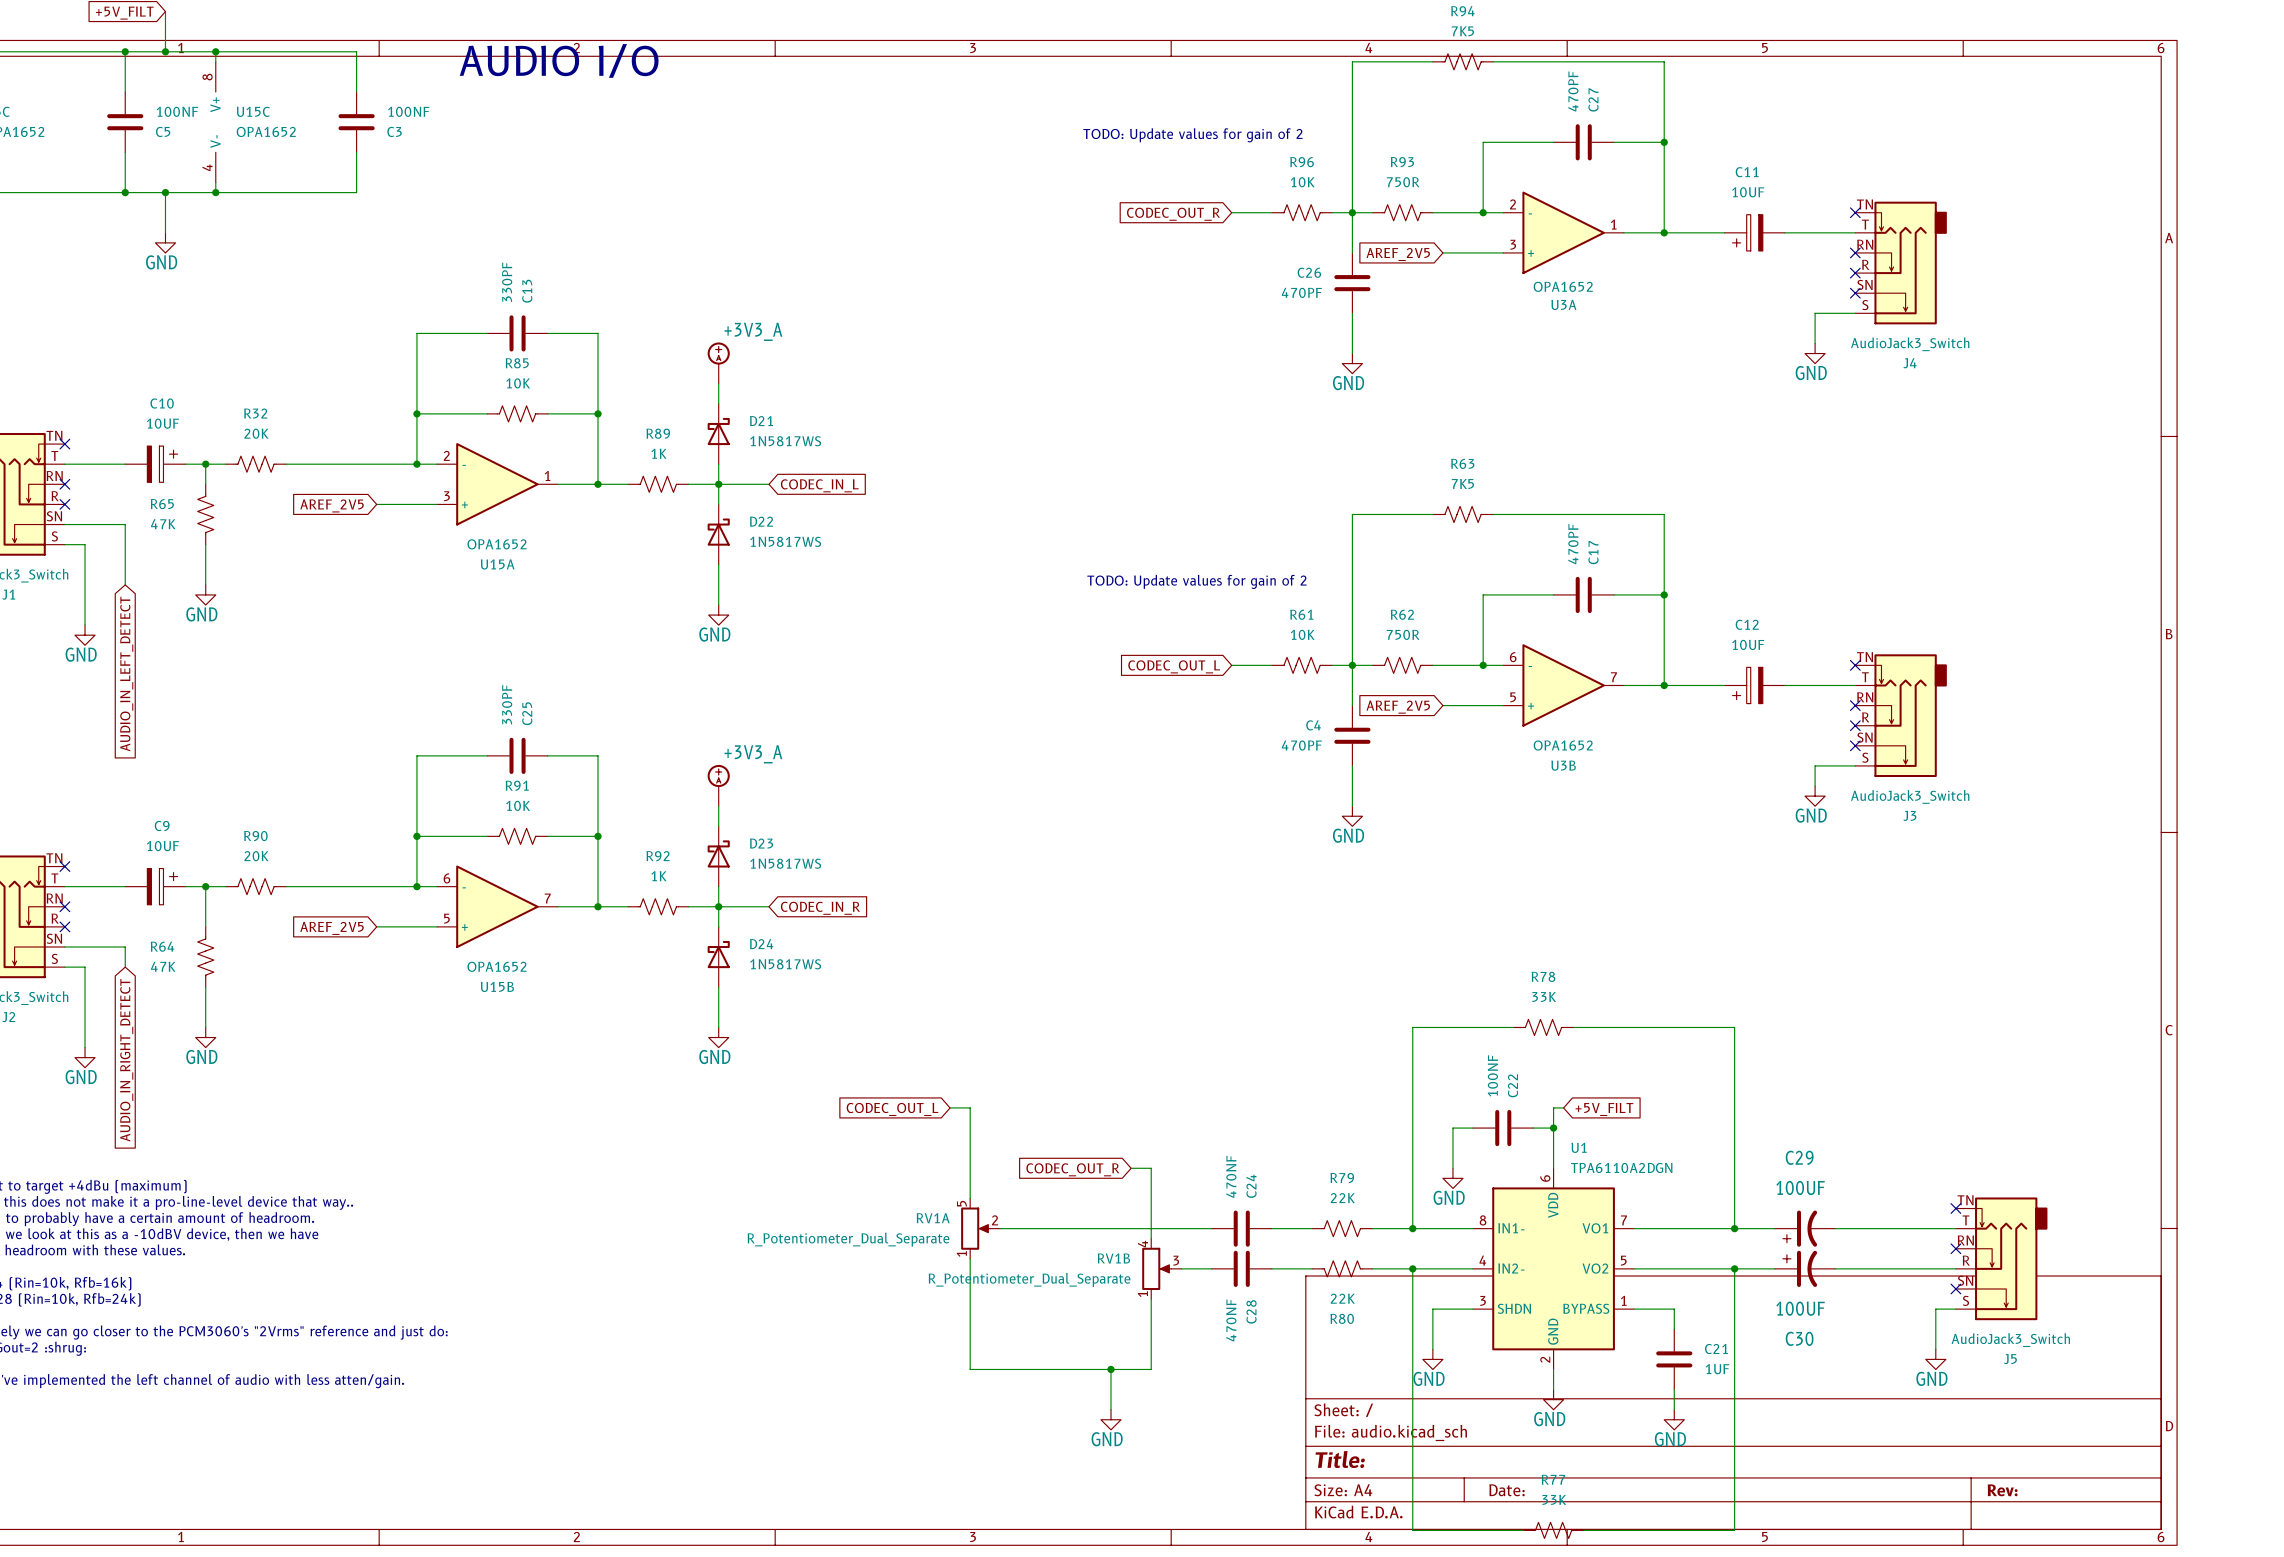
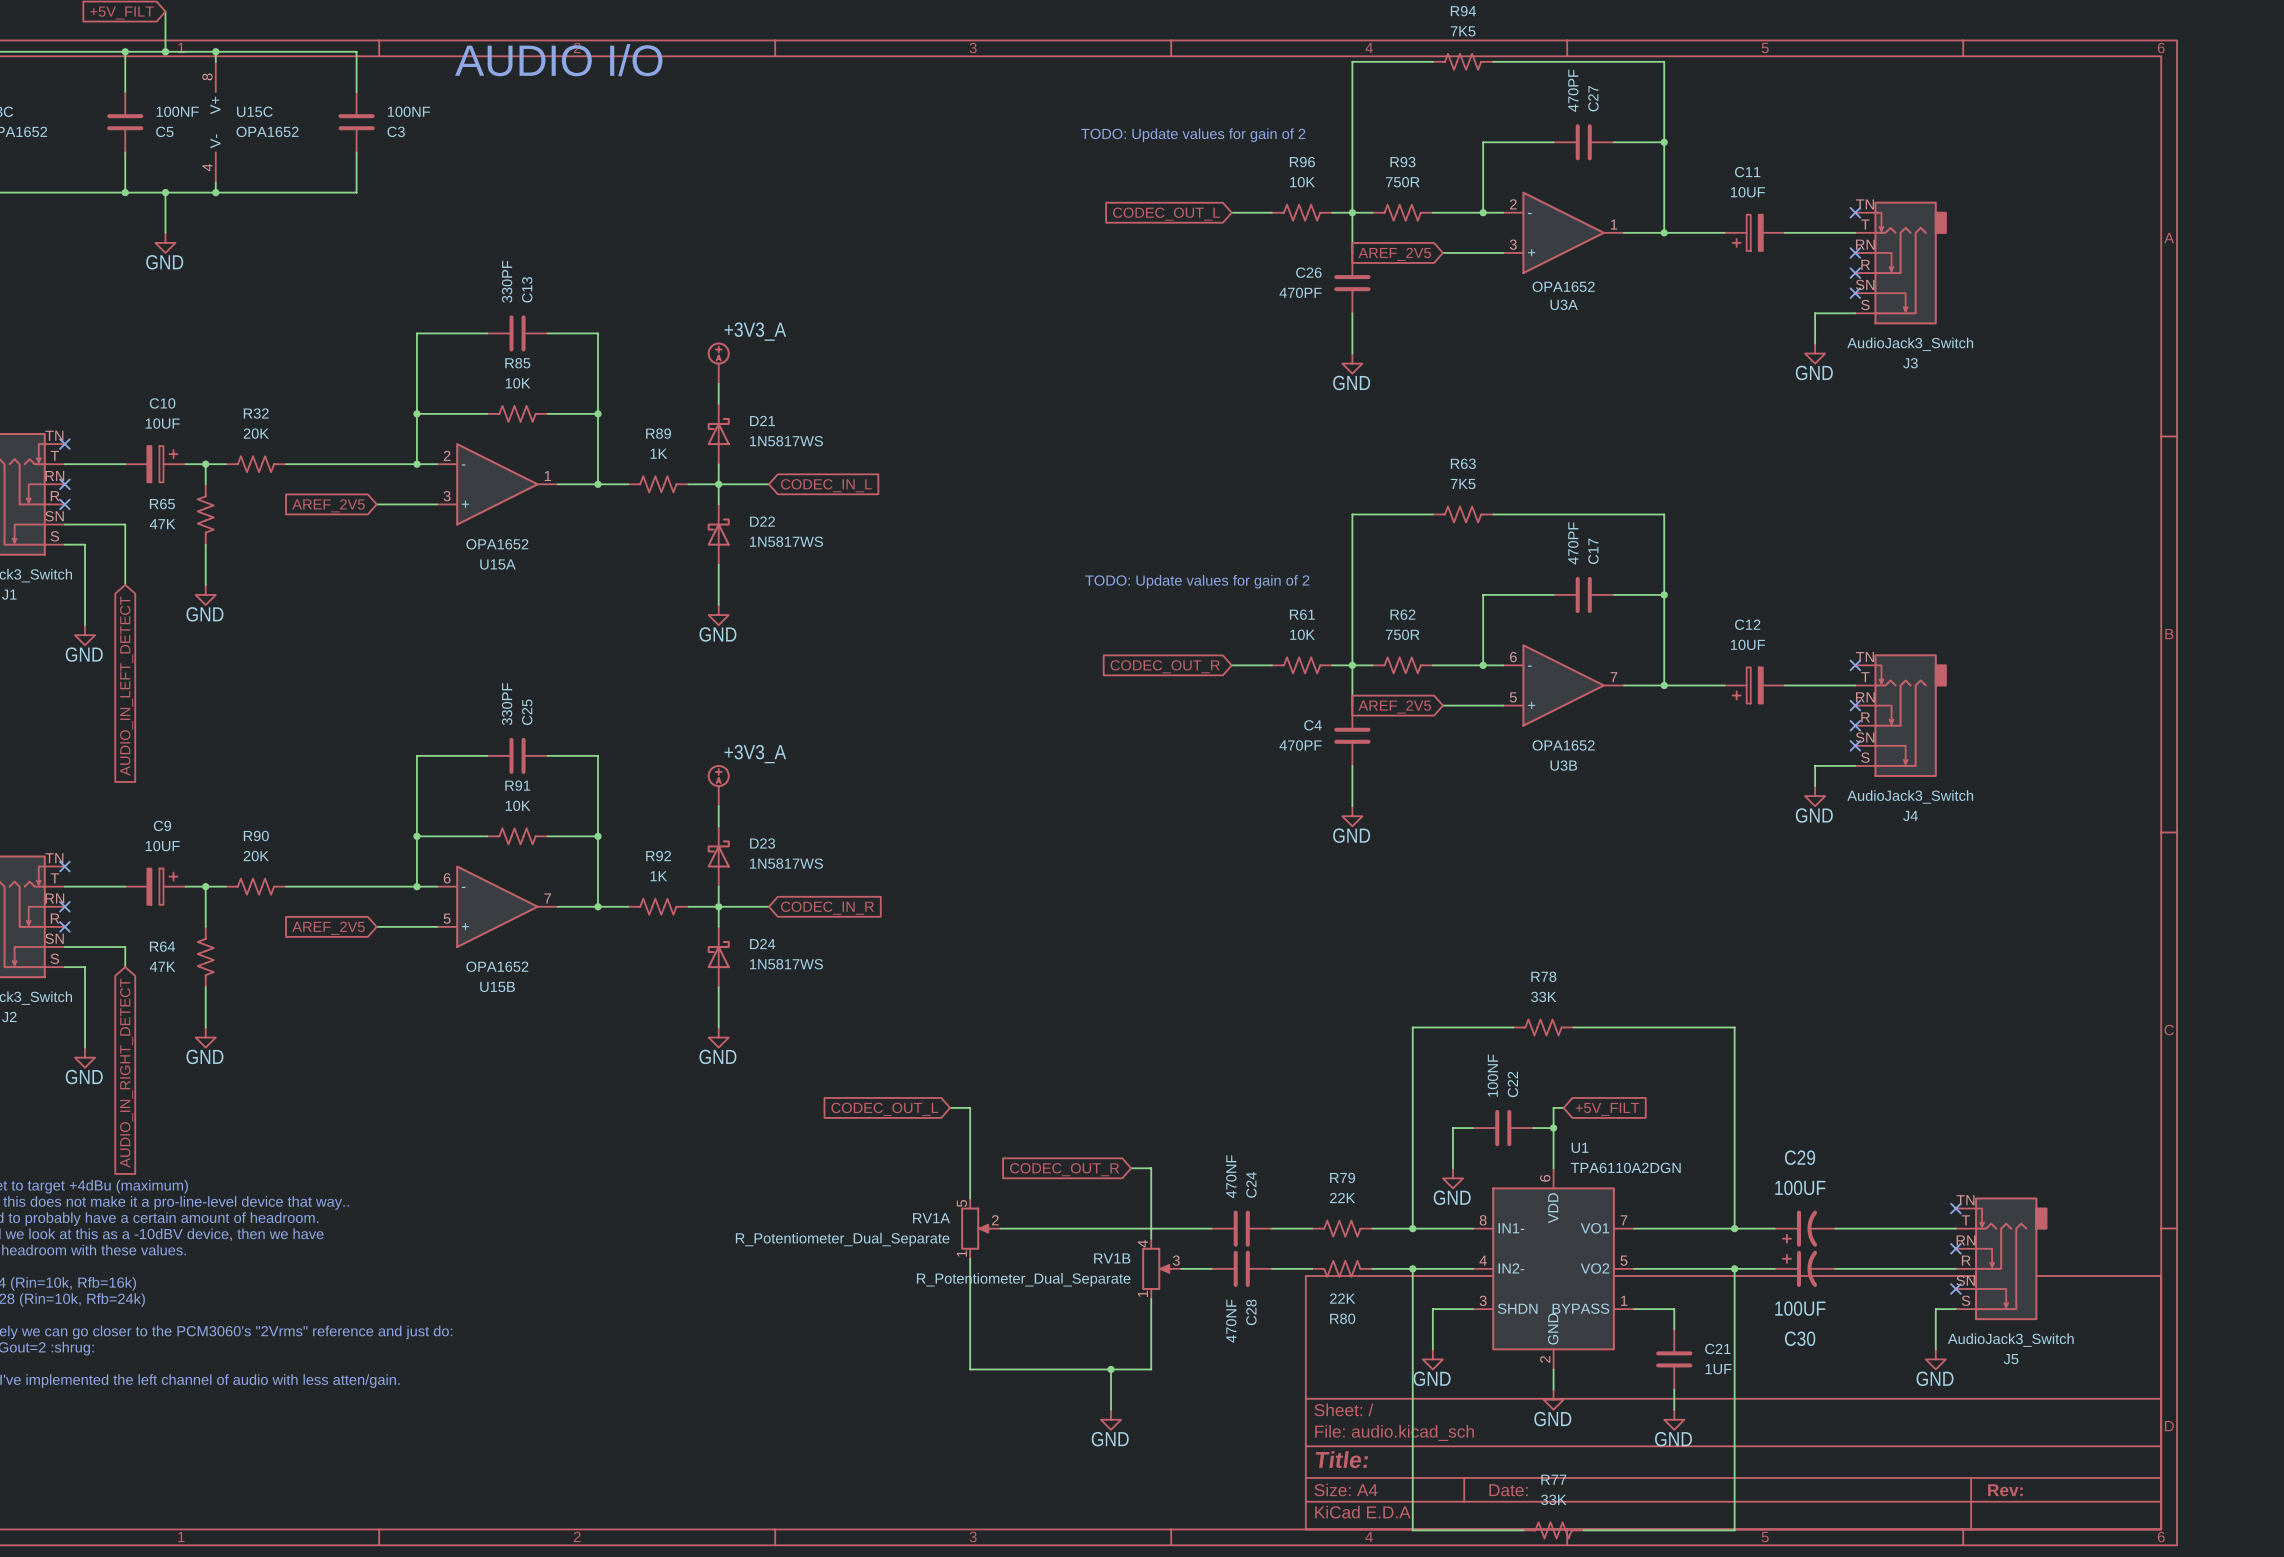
global label: CODEC_OUT_R (1173, 214) -> CODEC_OUT_L (1166, 214)
J4 name: J4 (1909, 363) -> J3 (1910, 363)
global label: CODEC_OUT_L (1174, 666) -> CODEC_OUT_R (1165, 666)
J3 name: J3 (1909, 815) -> J4 (1910, 815)

